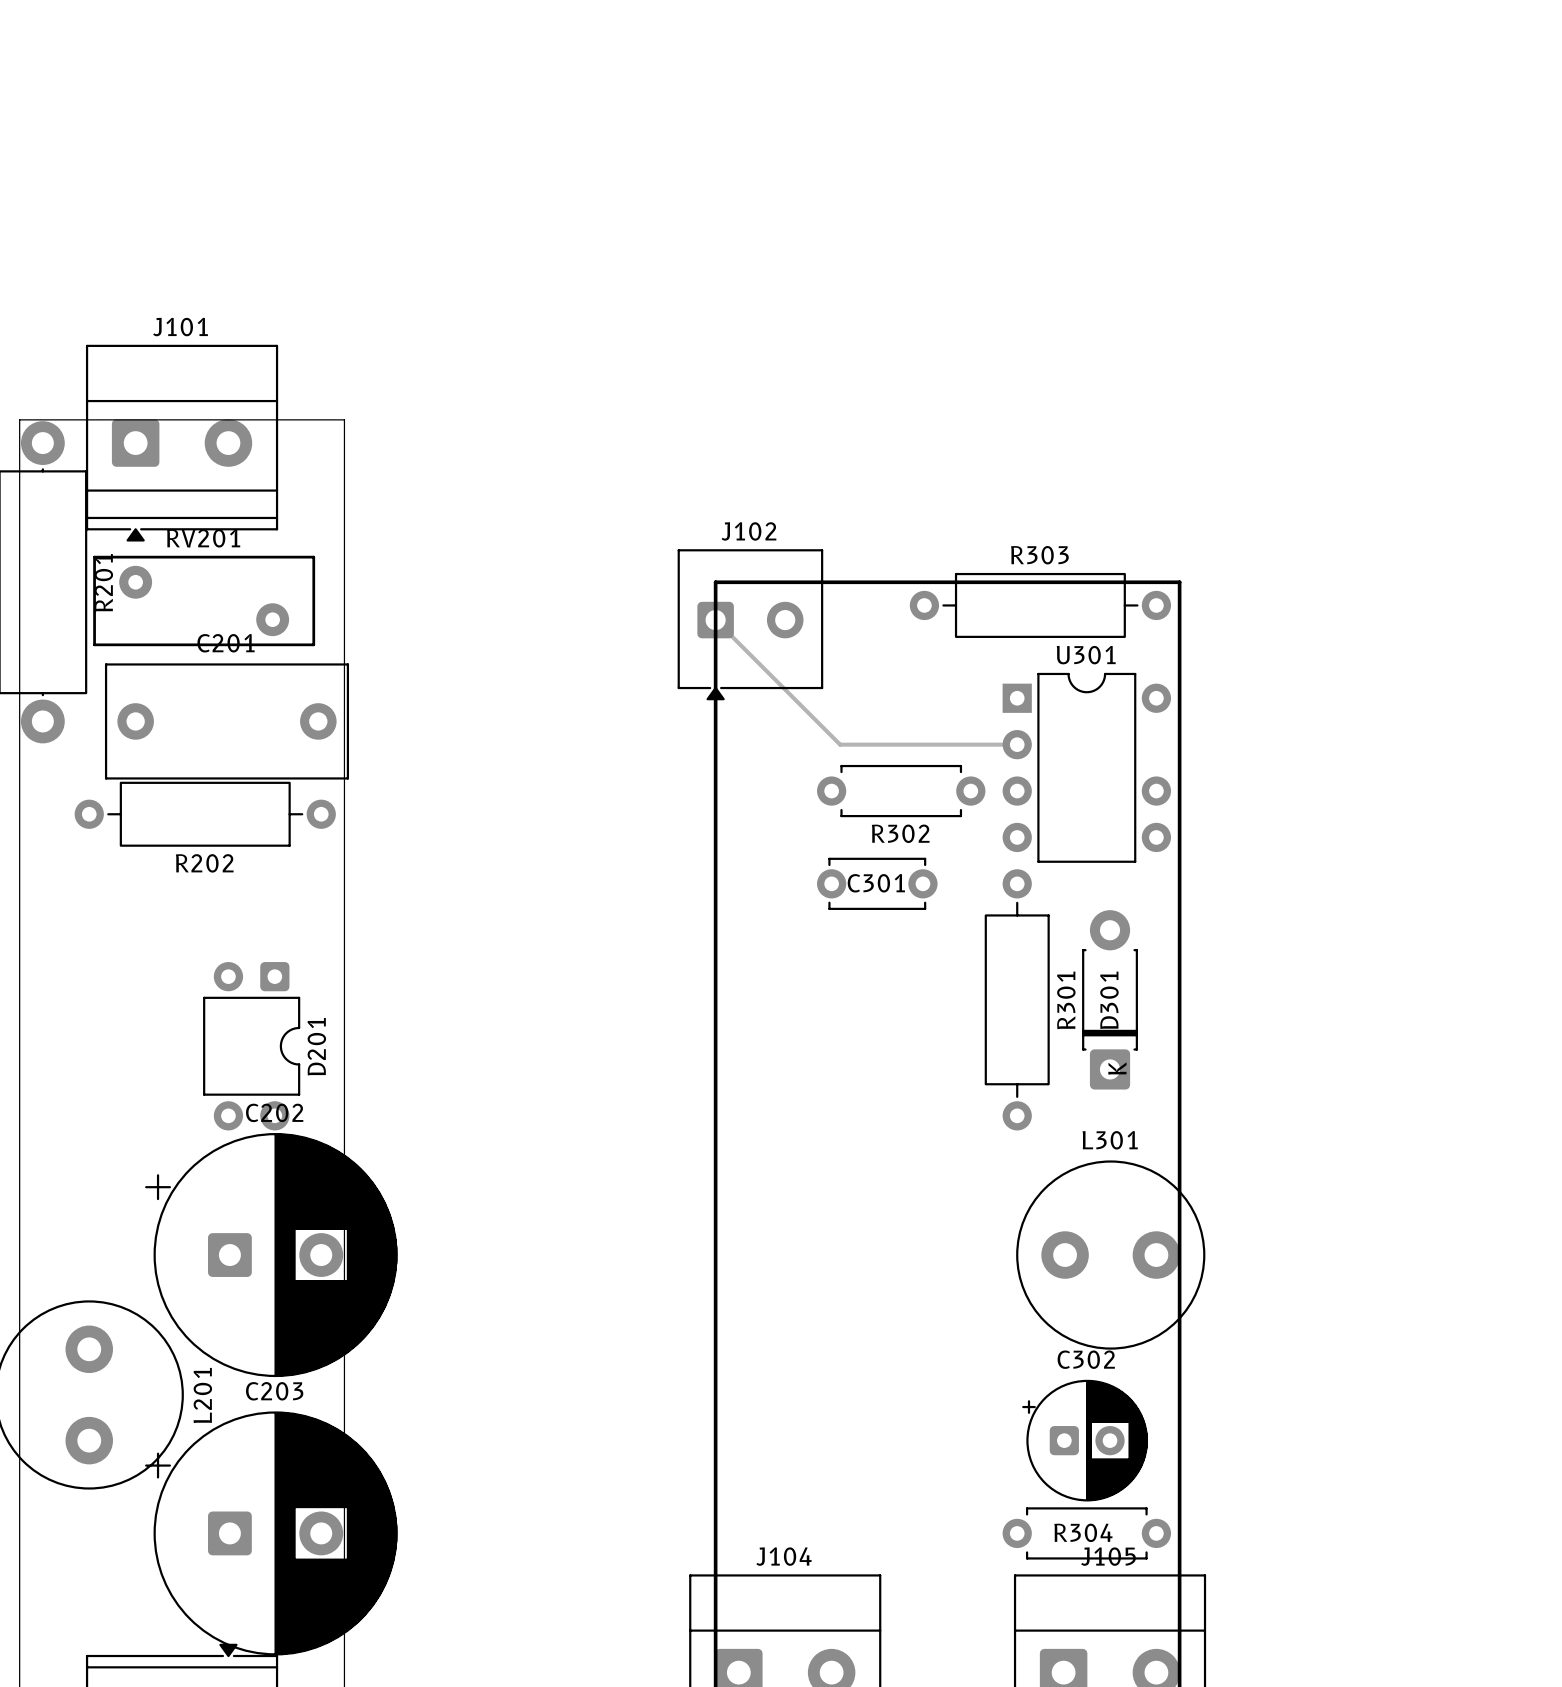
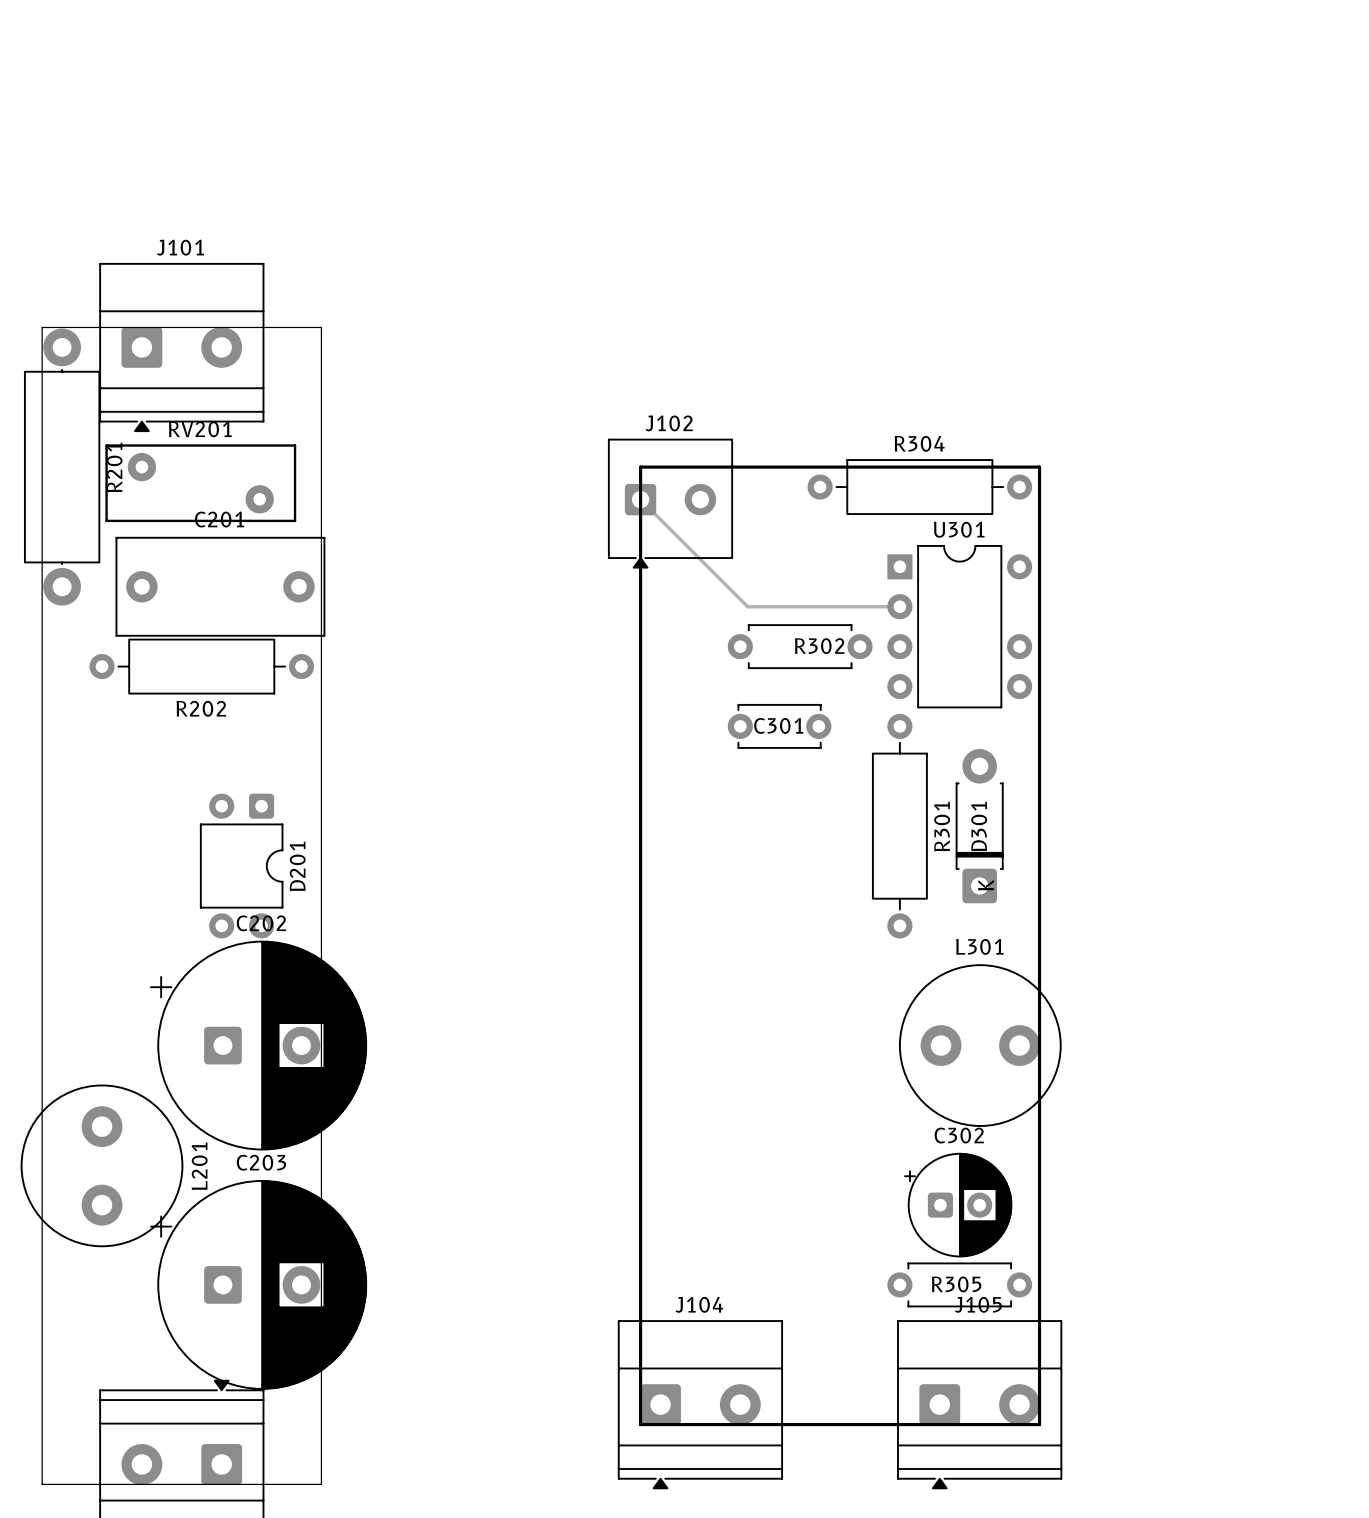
R303 name: R303 (1039, 555) -> R304 (919, 443)
R302 name position: R302 (900, 833) -> R302 (819, 646)
R304 name: R304 (1083, 1532) -> R305 (956, 1284)

